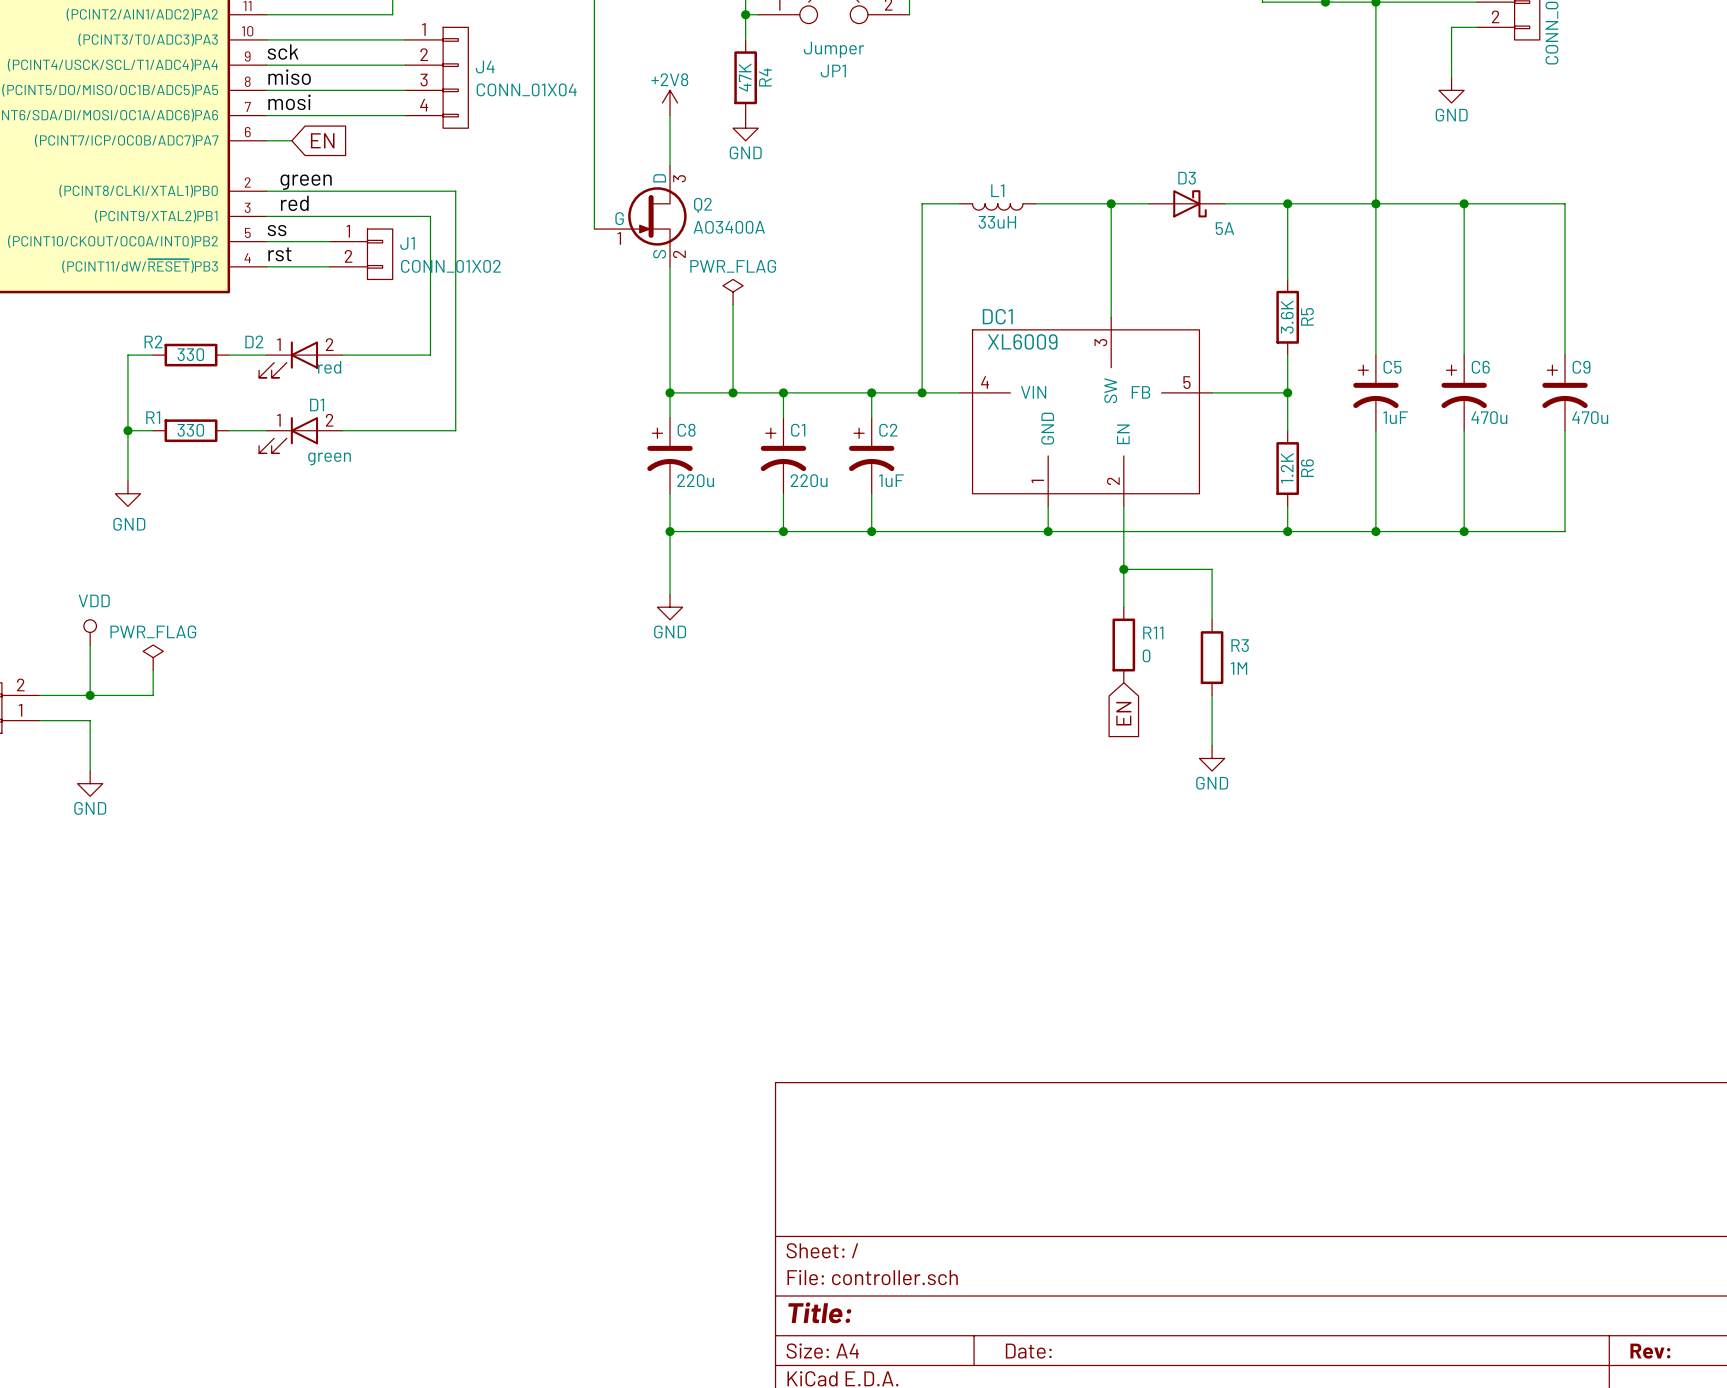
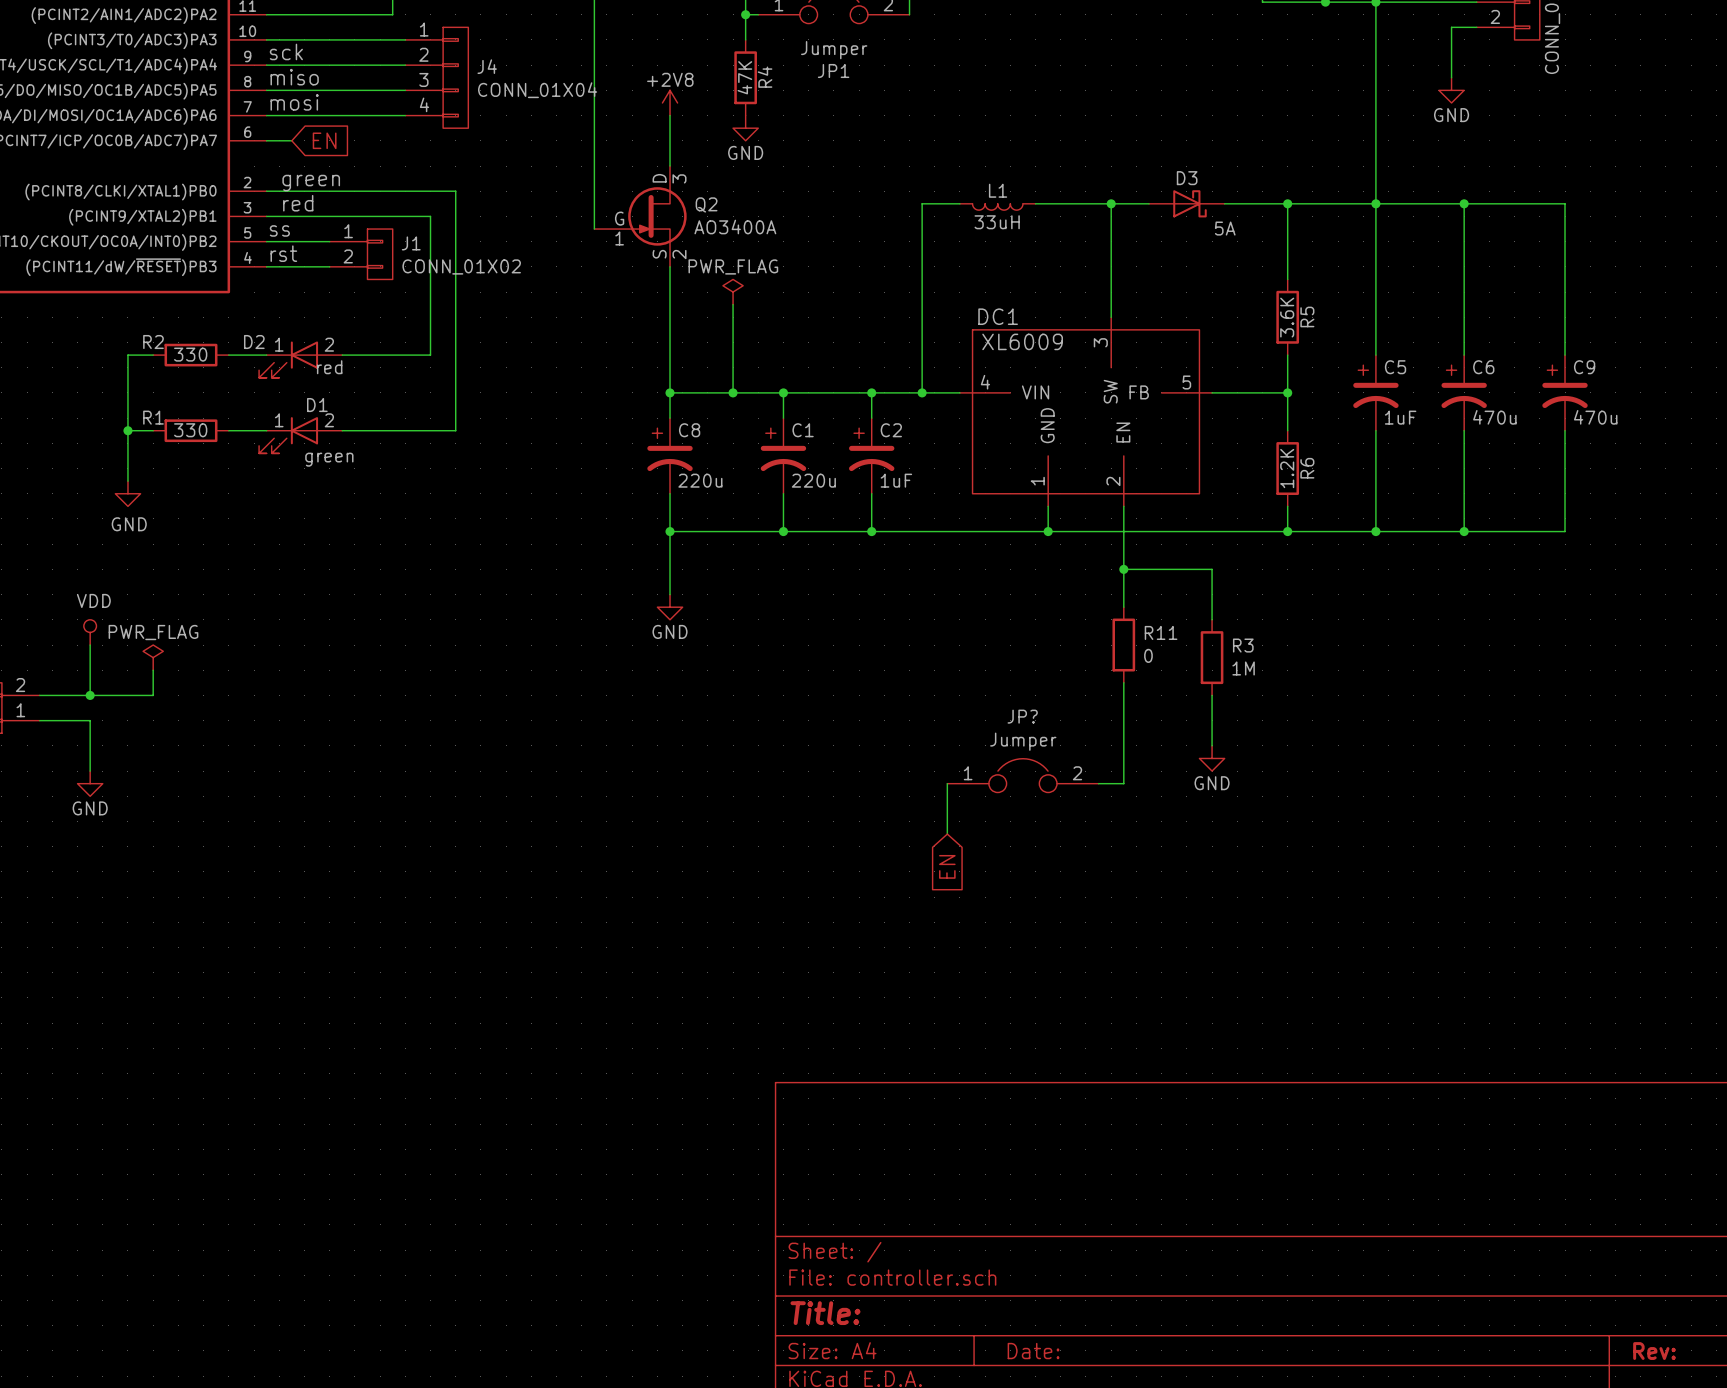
wire: none -> (1123, 682) (1123, 783) (1098, 783)
global label position: EN (1123, 713) -> EN (947, 866)
JP?: none -> Jumper (1022, 775)
wire: none -> (947, 783) (947, 834)

